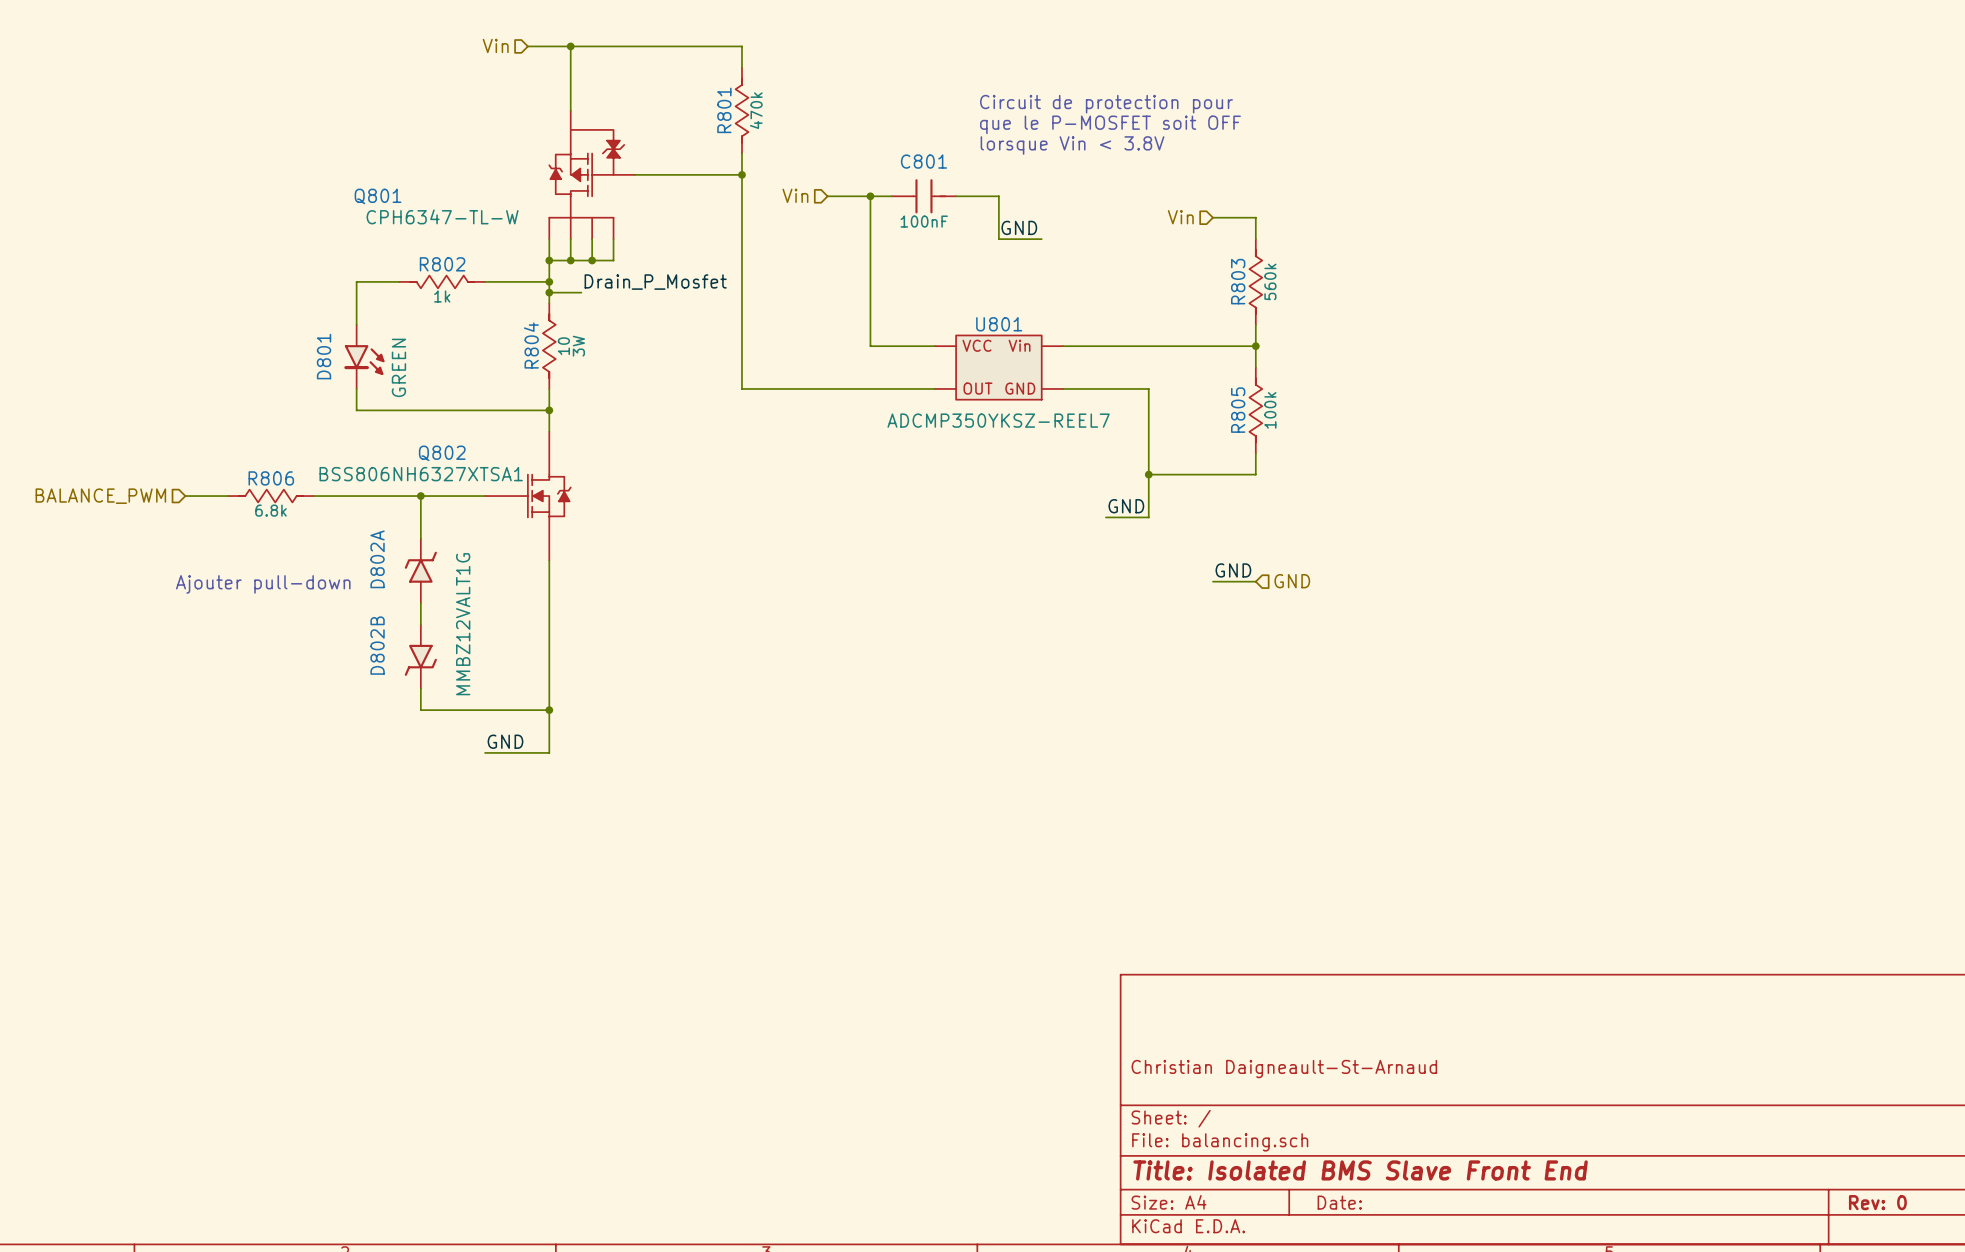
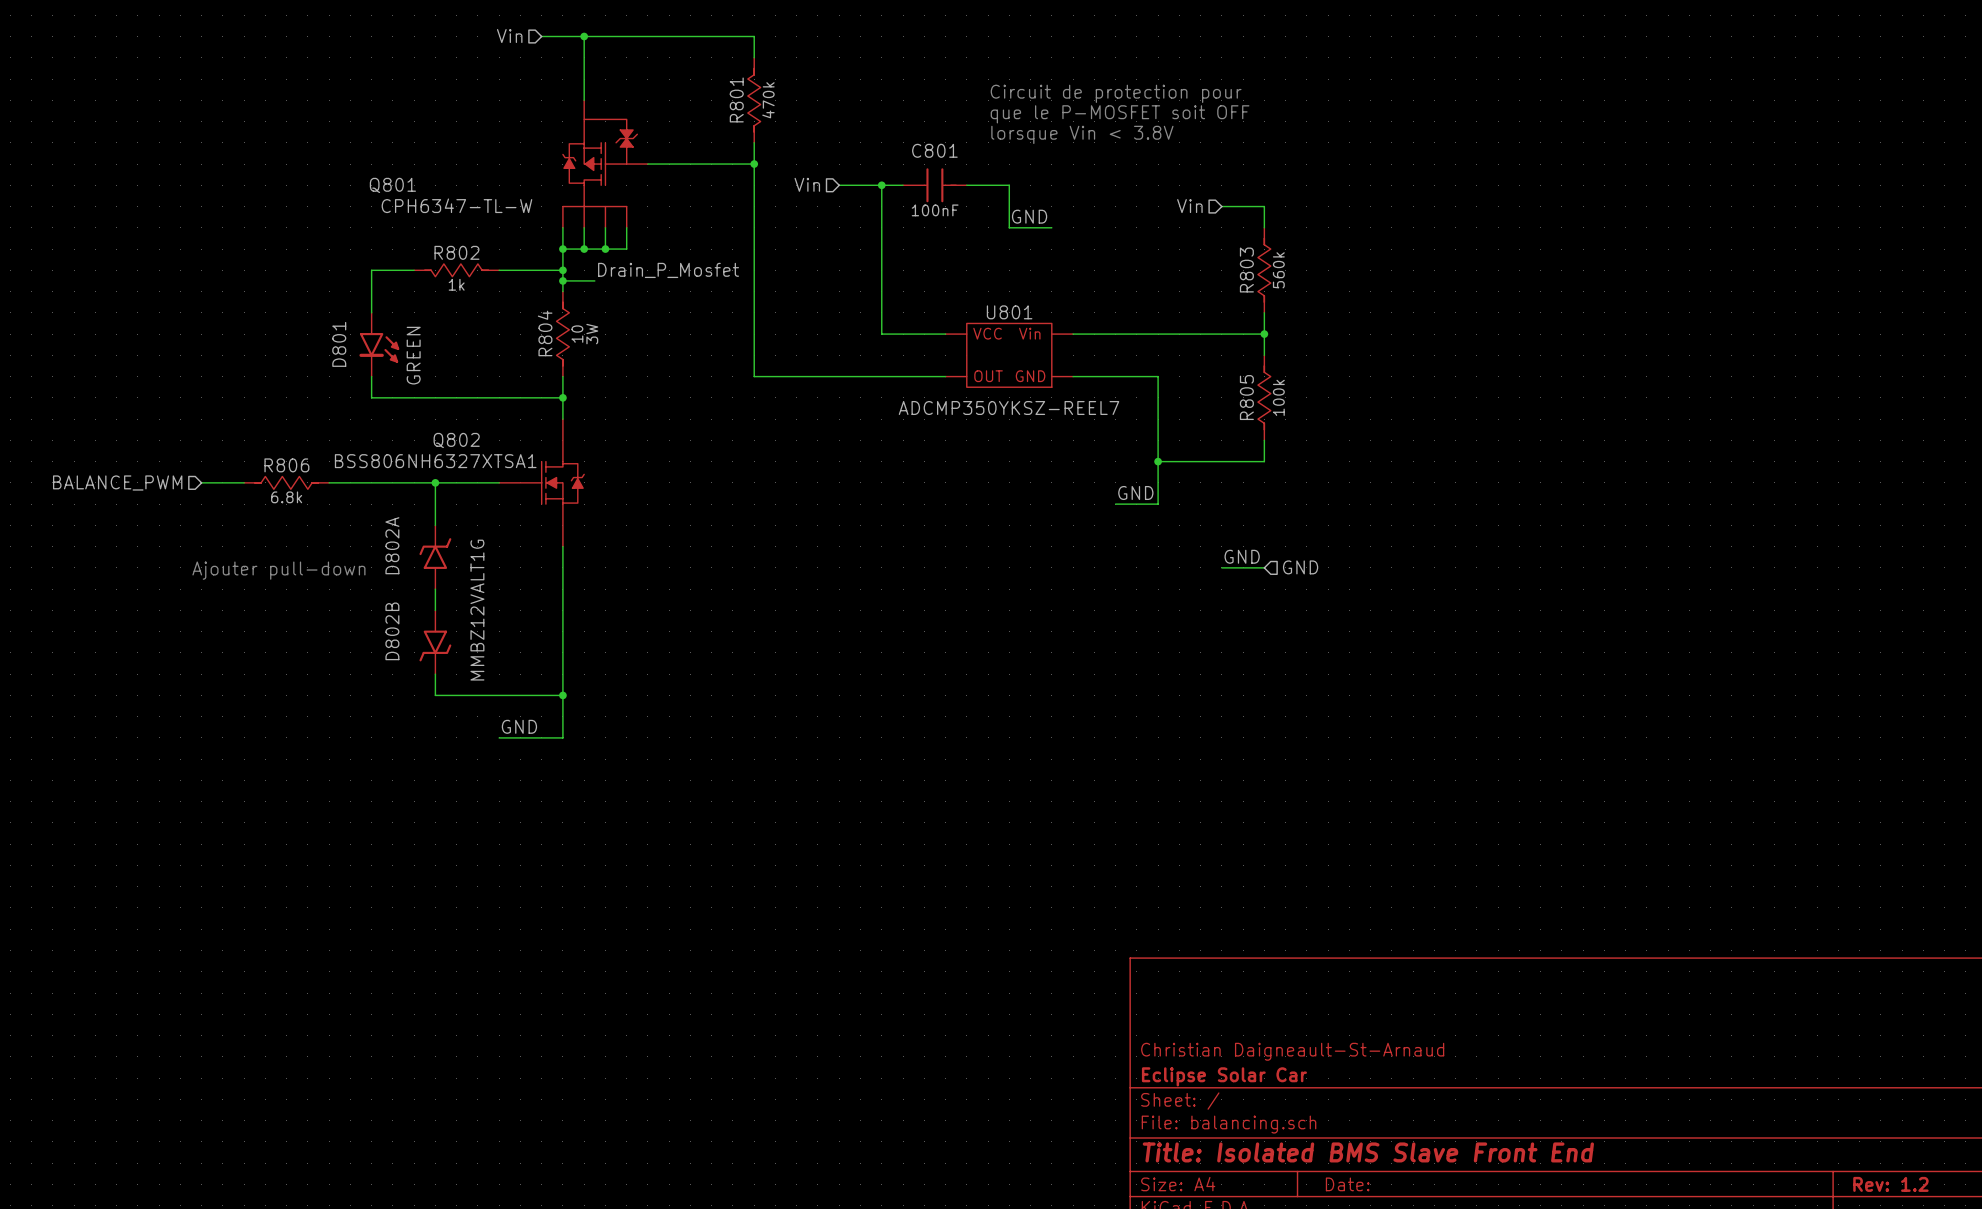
title block: none -> Eclipse Solar Car (1224, 1076)
title block: Rev: 0 (1877, 1202) -> Rev: 1.2 (1890, 1184)

